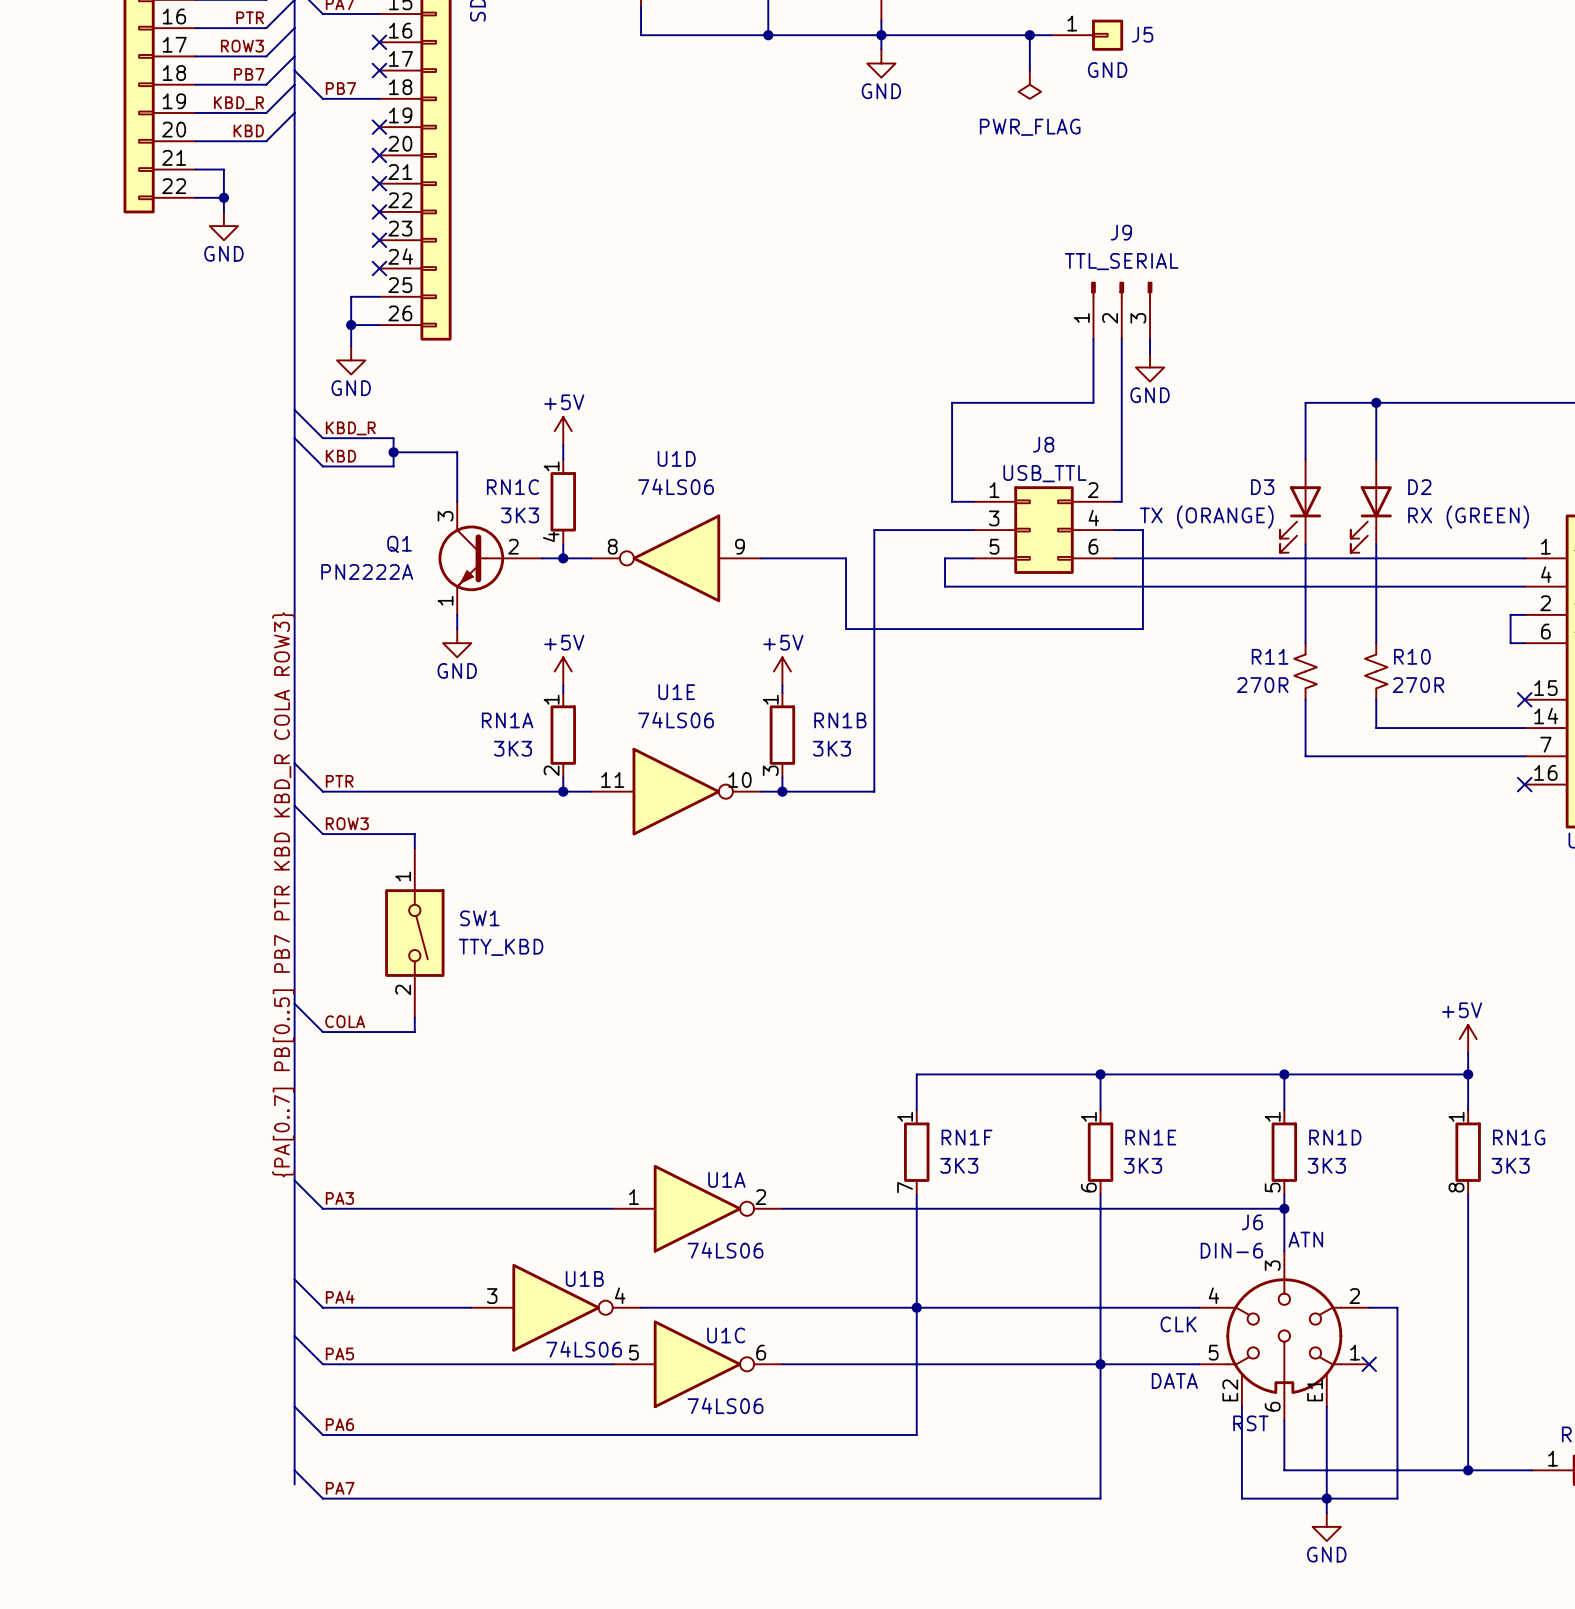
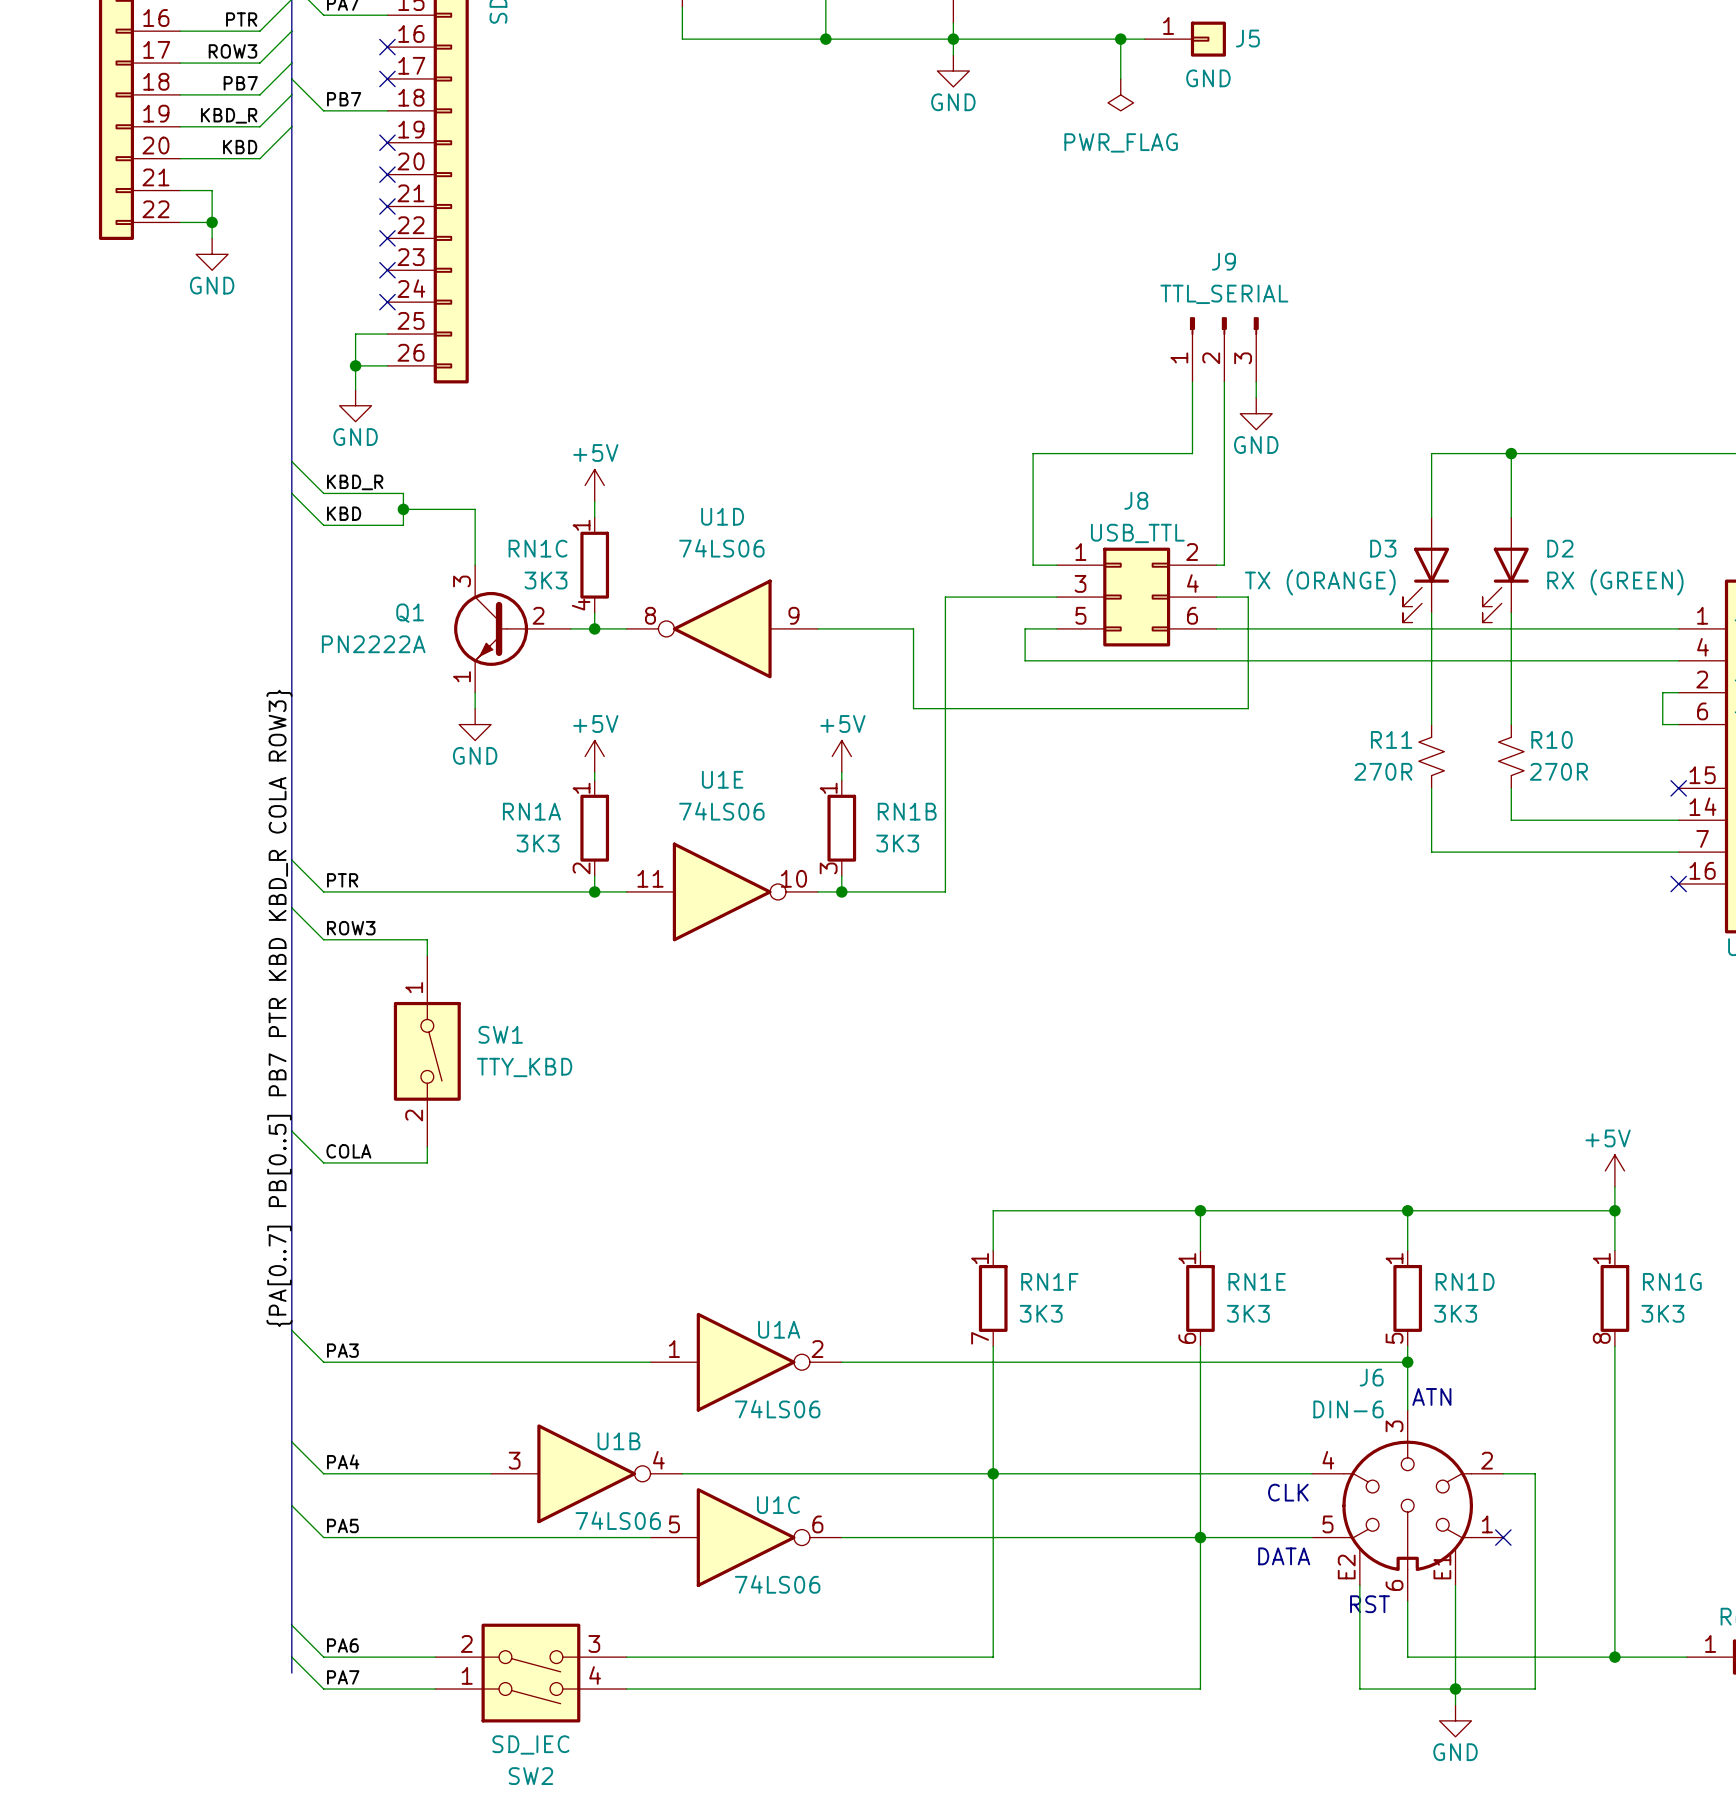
wire: (294, 1406) (322, 1434) (916, 1434) -> (626, 1657) (993, 1657) (993, 1617)
label position: PA6 (339, 1424) -> PA6 (342, 1645)
wire: none -> (291, 1625) (323, 1657) (435, 1657)
SW2: none -> SD_IEC (530, 1673)

